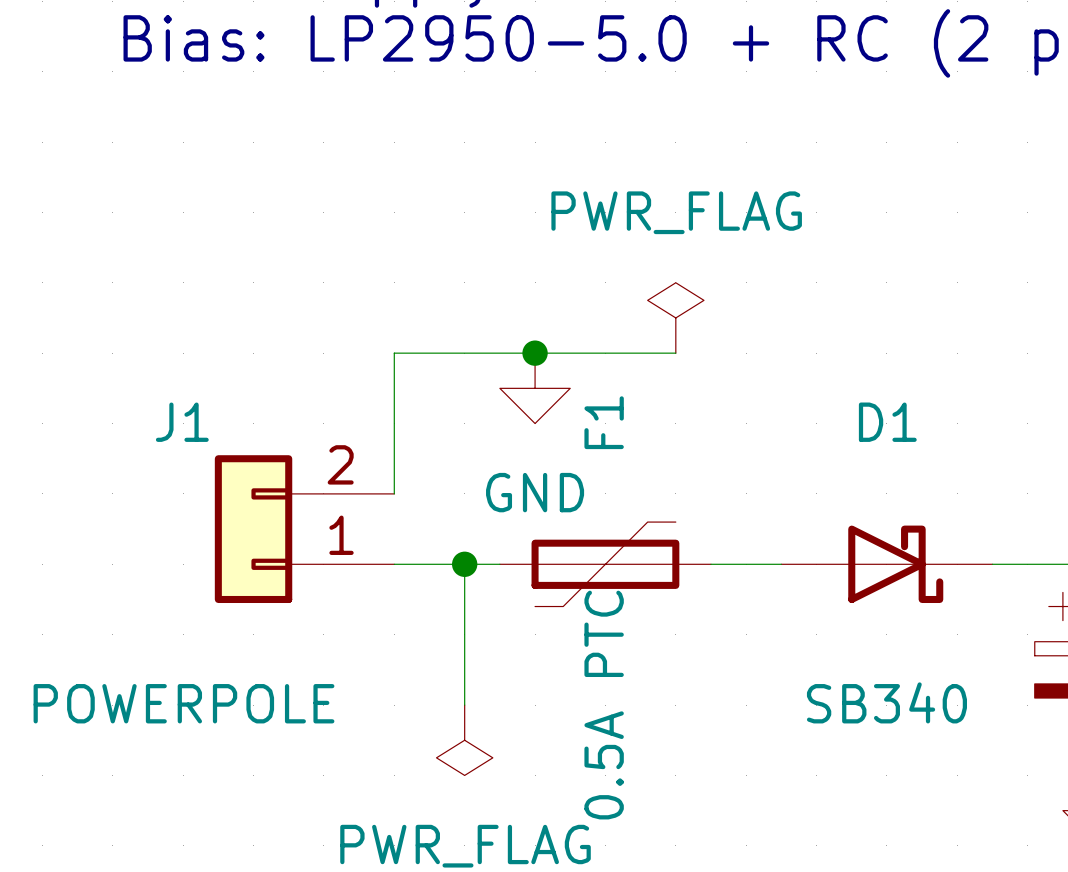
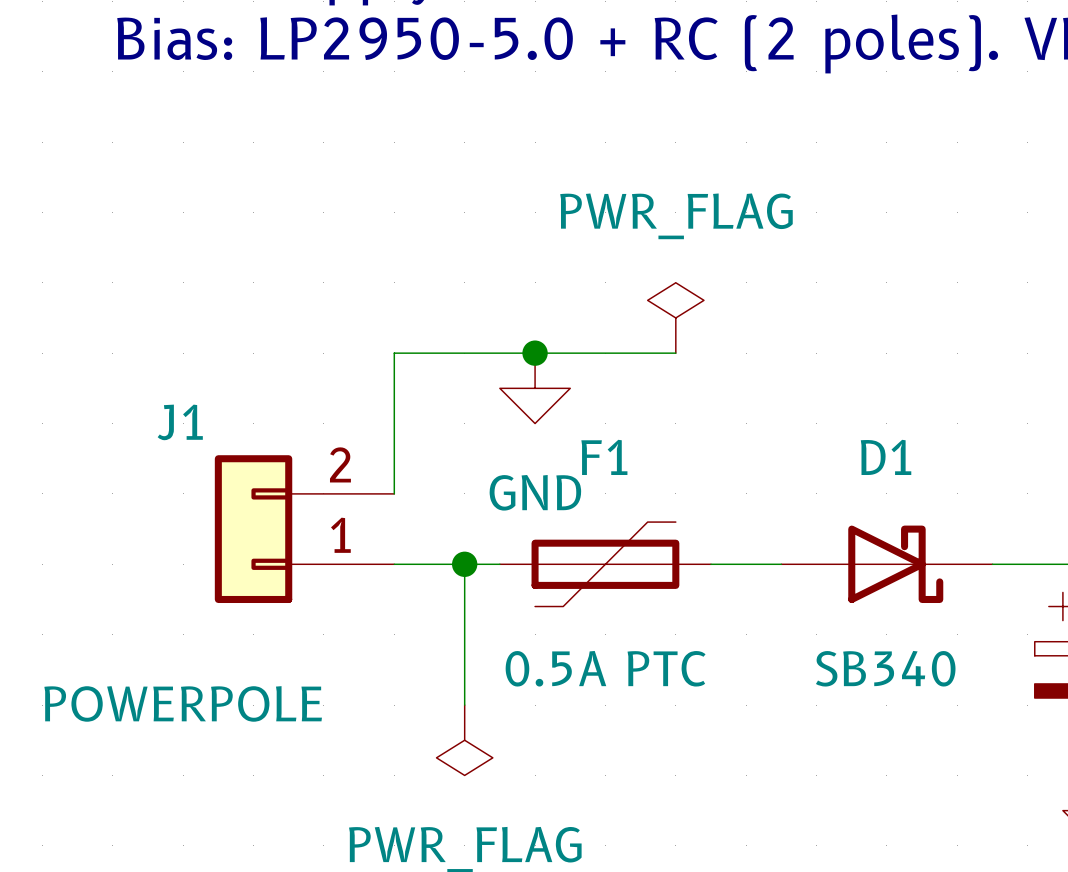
F1 name rotation: 0° (604, 422) -> 90° clockwise (604, 457)
D1 name position: D1 (887, 422) -> D1 (886, 457)
D1 value position: SB340 (886, 702) -> SB340 (885, 668)
F1 value rotation: 0° (604, 705) -> 90° clockwise (605, 668)

